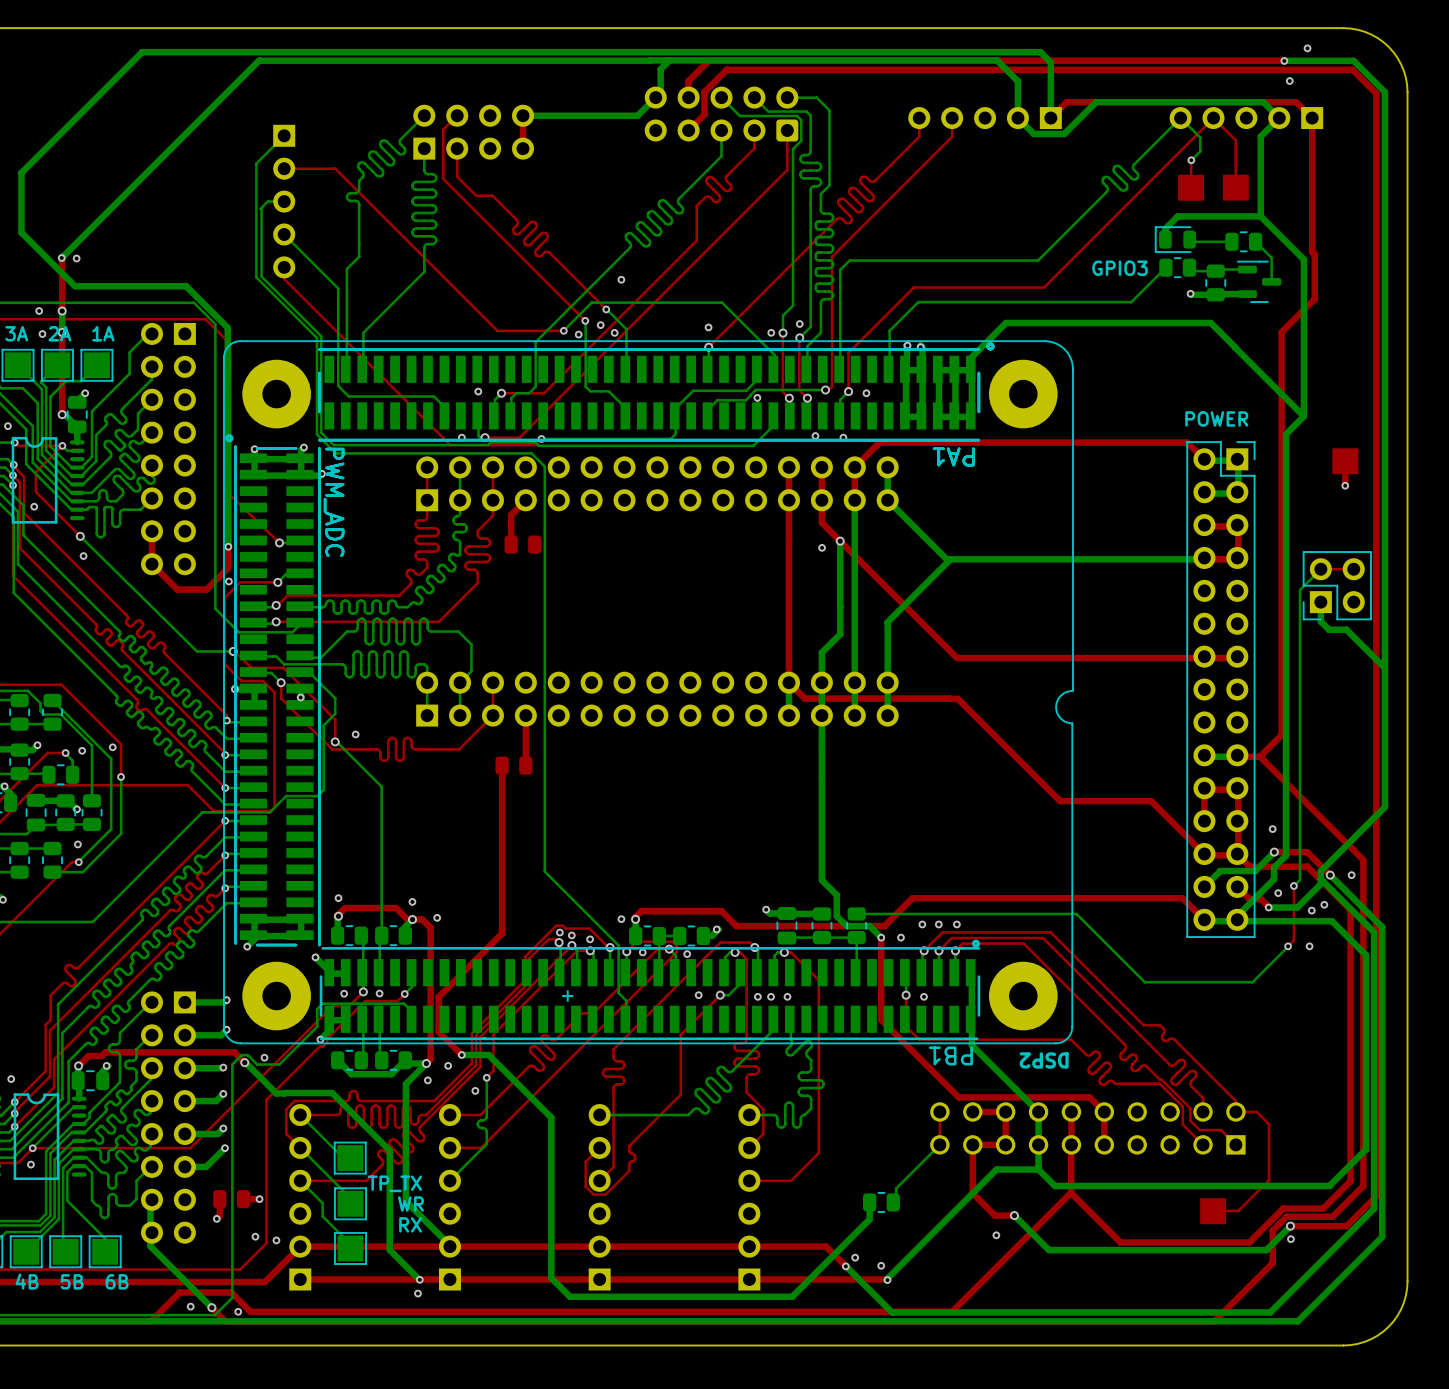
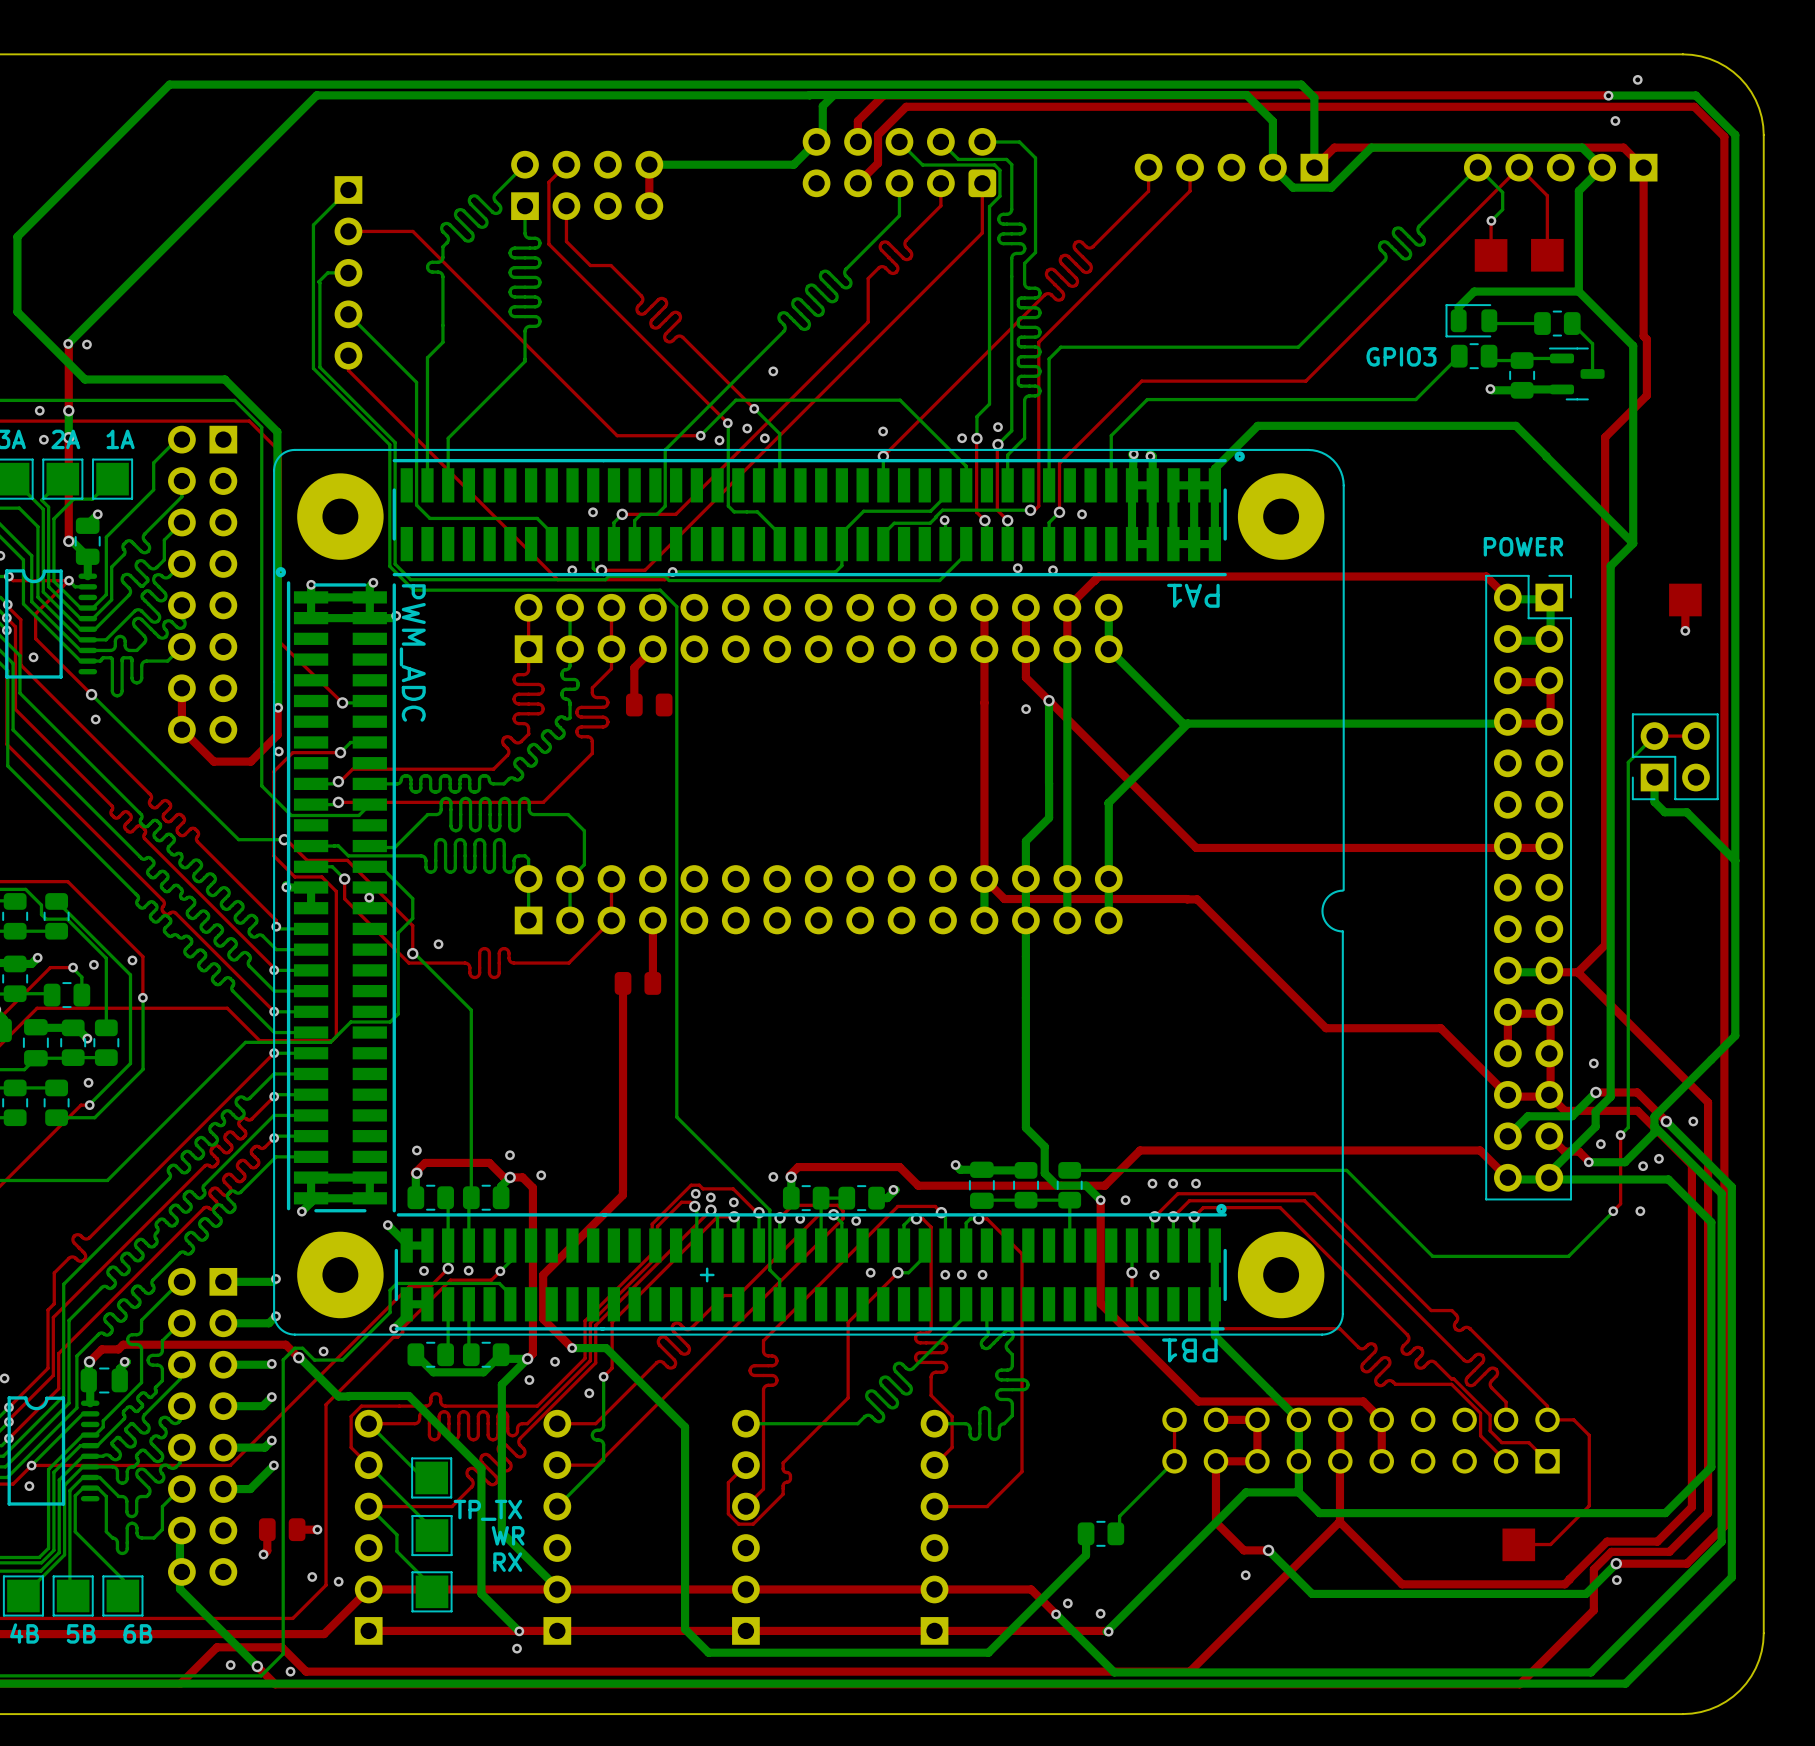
part: (656, 391) -> none
DSP2: (648, 692) -> none
part: none -> (808, 892)
part: (277, 695) -> none

